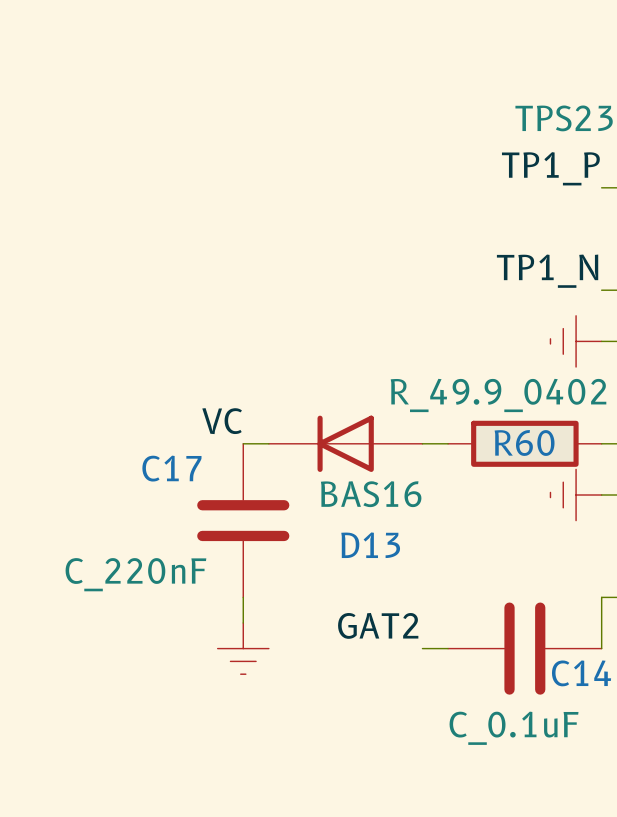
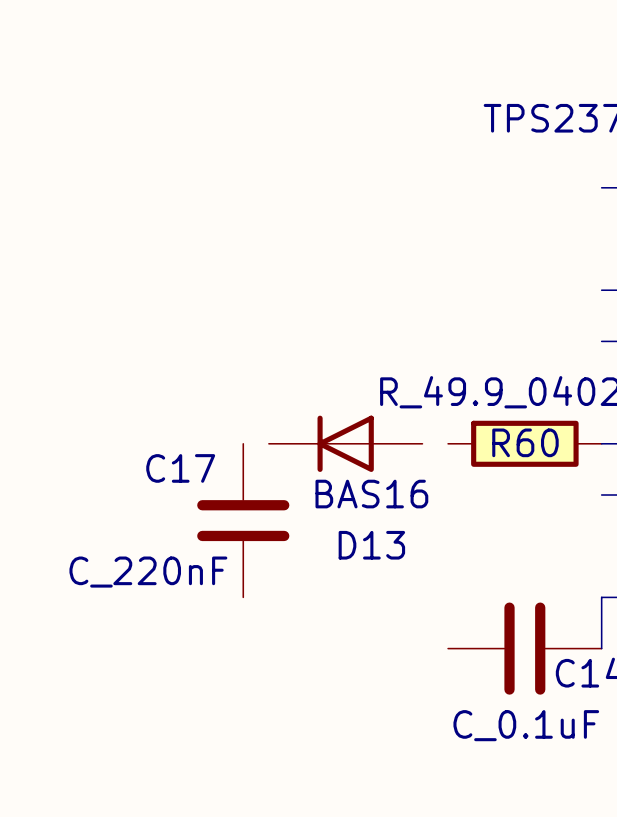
label: TP1_P (550, 168) -> none
label: TP1_N (547, 271) -> none
power symbol: (576, 341) -> none
label: VC (222, 421) -> none
wire: (243, 443) (268, 443) -> none
wire: (422, 443) (448, 443) -> none
power symbol: (576, 495) -> none
wire: (243, 597) (243, 622) -> none
label: GAT2 (378, 625) -> none
power symbol: (243, 648) -> none
wire: (422, 648) (448, 648) -> none

